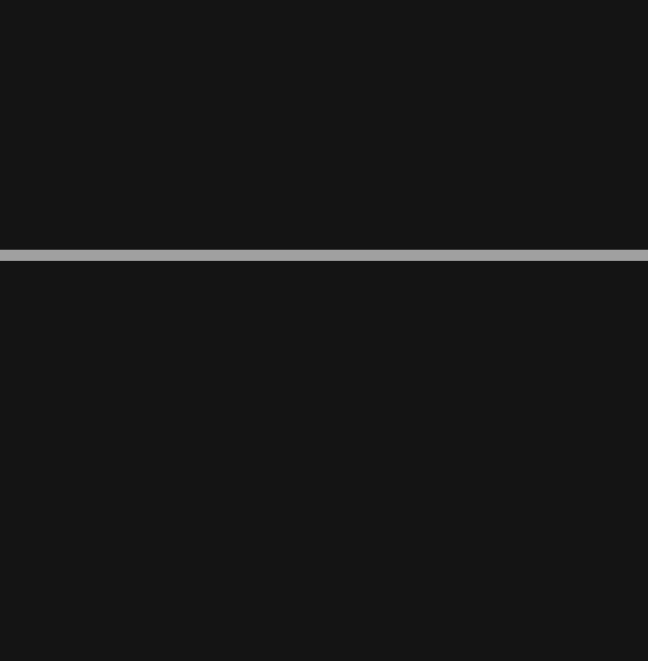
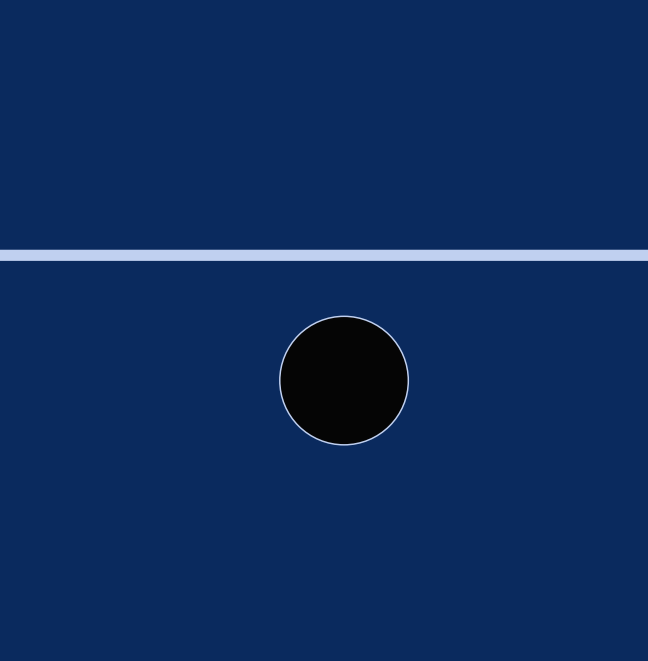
part: none -> (344, 380)

